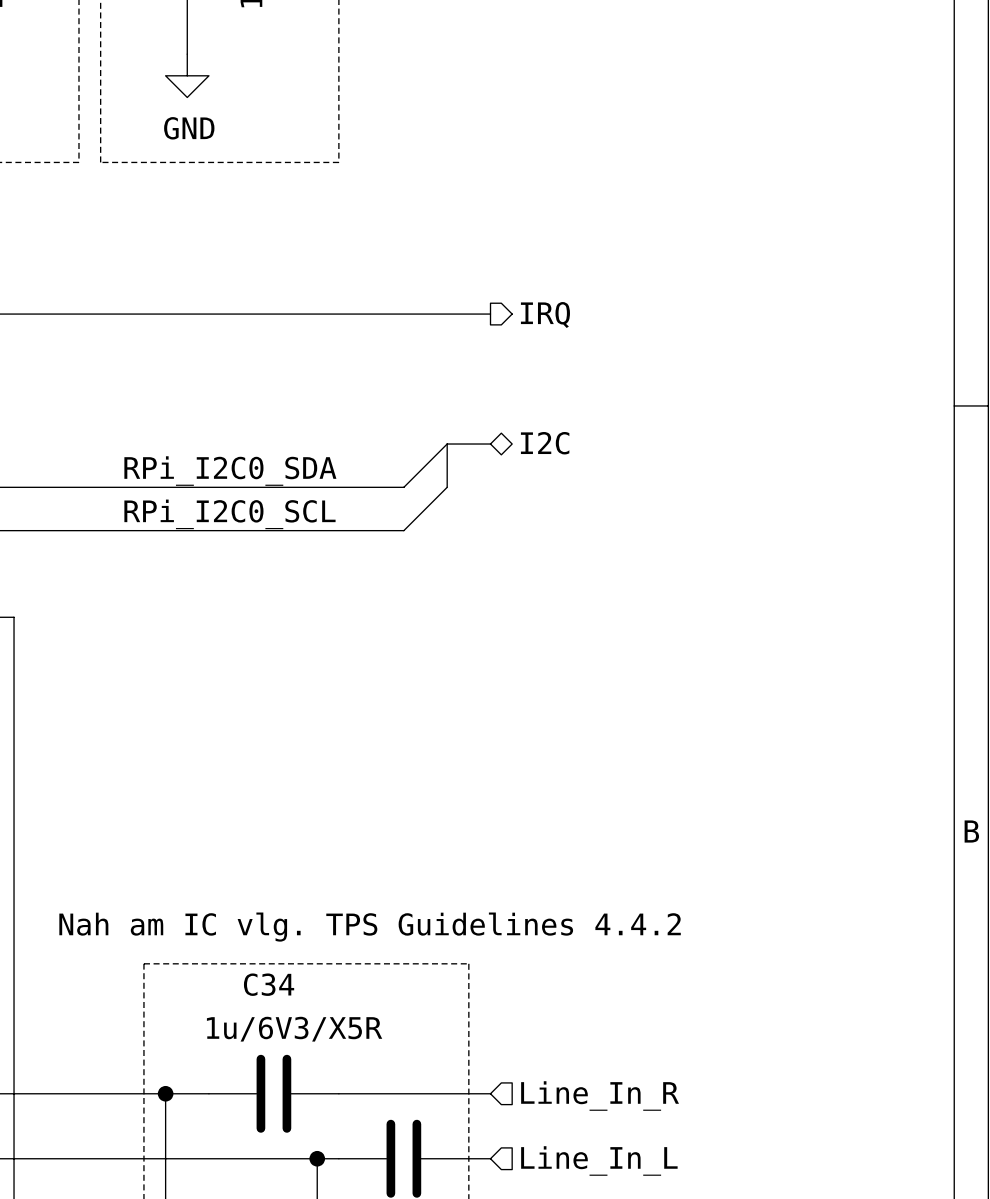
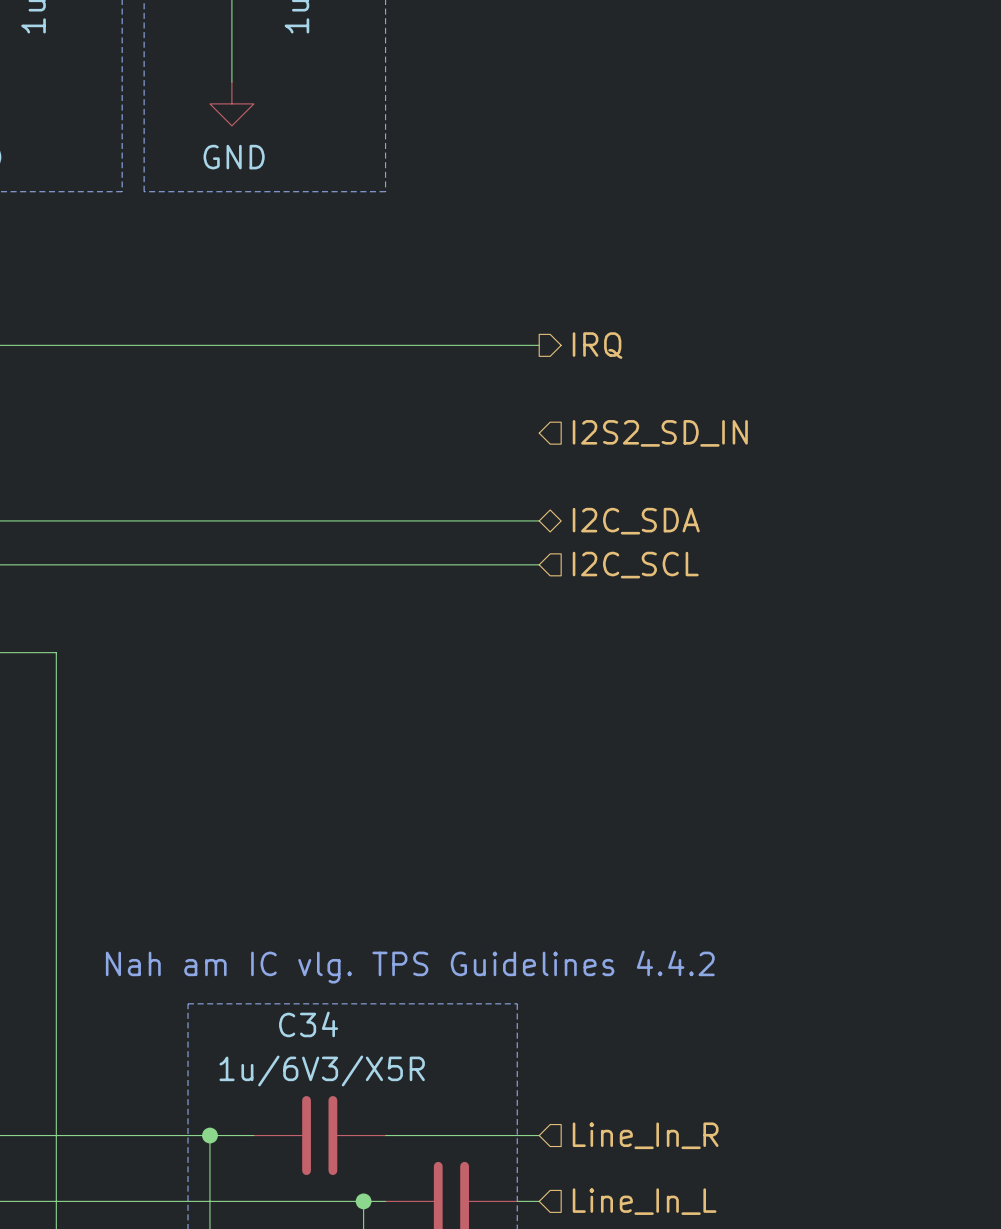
hierarchical label: none -> I2S2_SD_IN (660, 433)
hierarchical label: I2C (545, 443) -> none
wire: (447, 444) (403, 487) -> (539, 520) (451, 520)
bus: (490, 444) (447, 444) (447, 487) -> none
label: RPi_I2C0_SDA (230, 471) -> none
wire: (447, 487) (403, 530) -> (539, 564) (451, 564)
hierarchical label: none -> I2C_SDA (636, 521)
label: RPi_I2C0_SCL (229, 514) -> none
hierarchical label: none -> I2C_SCL (635, 565)

